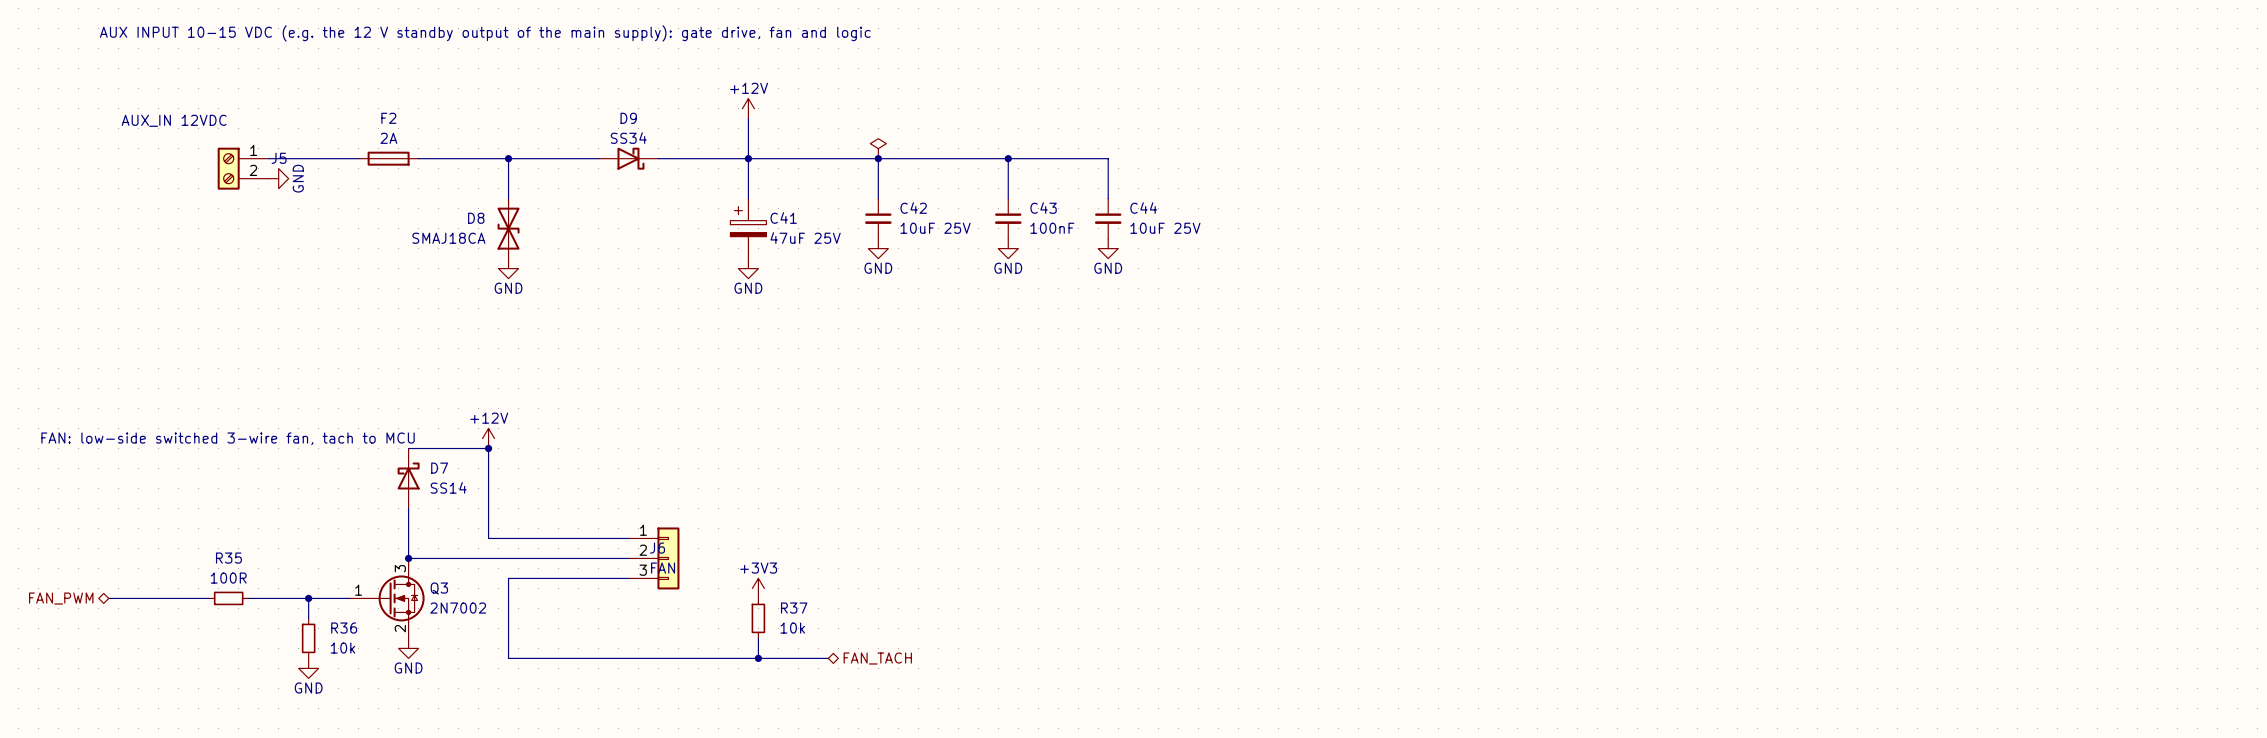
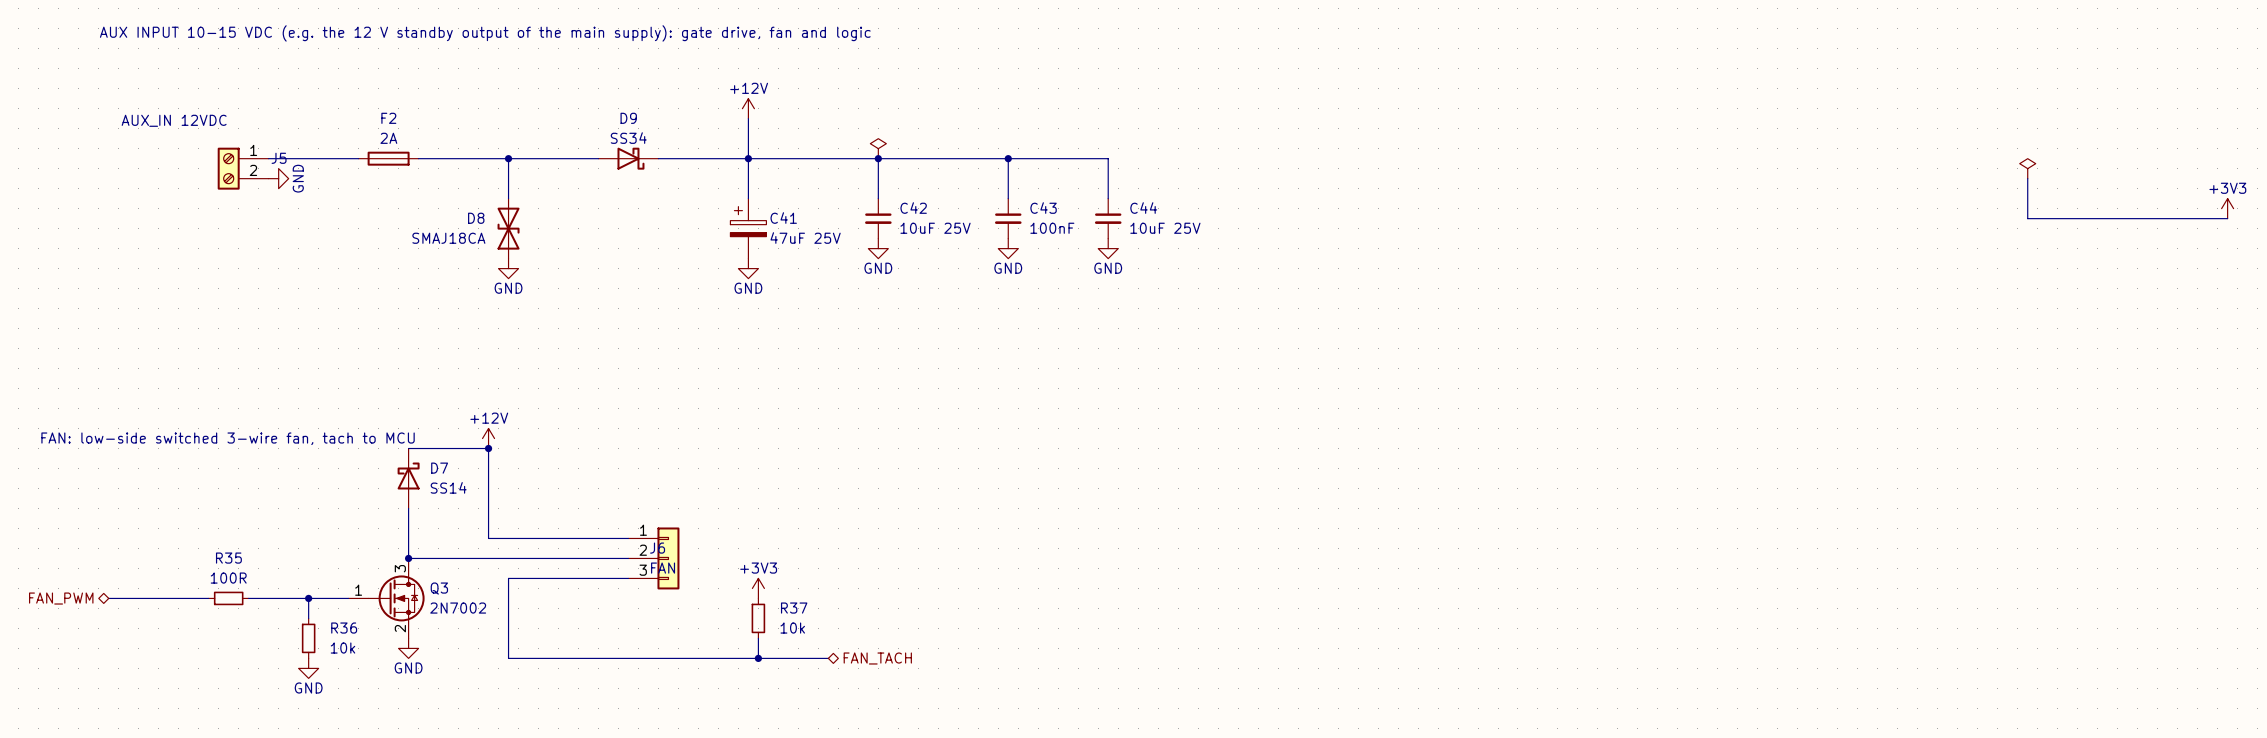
power symbol: none -> (2027, 168)
wire: none -> (2027, 178) (2027, 218) (2227, 218)
power symbol: none -> +3V3 (2227, 208)

